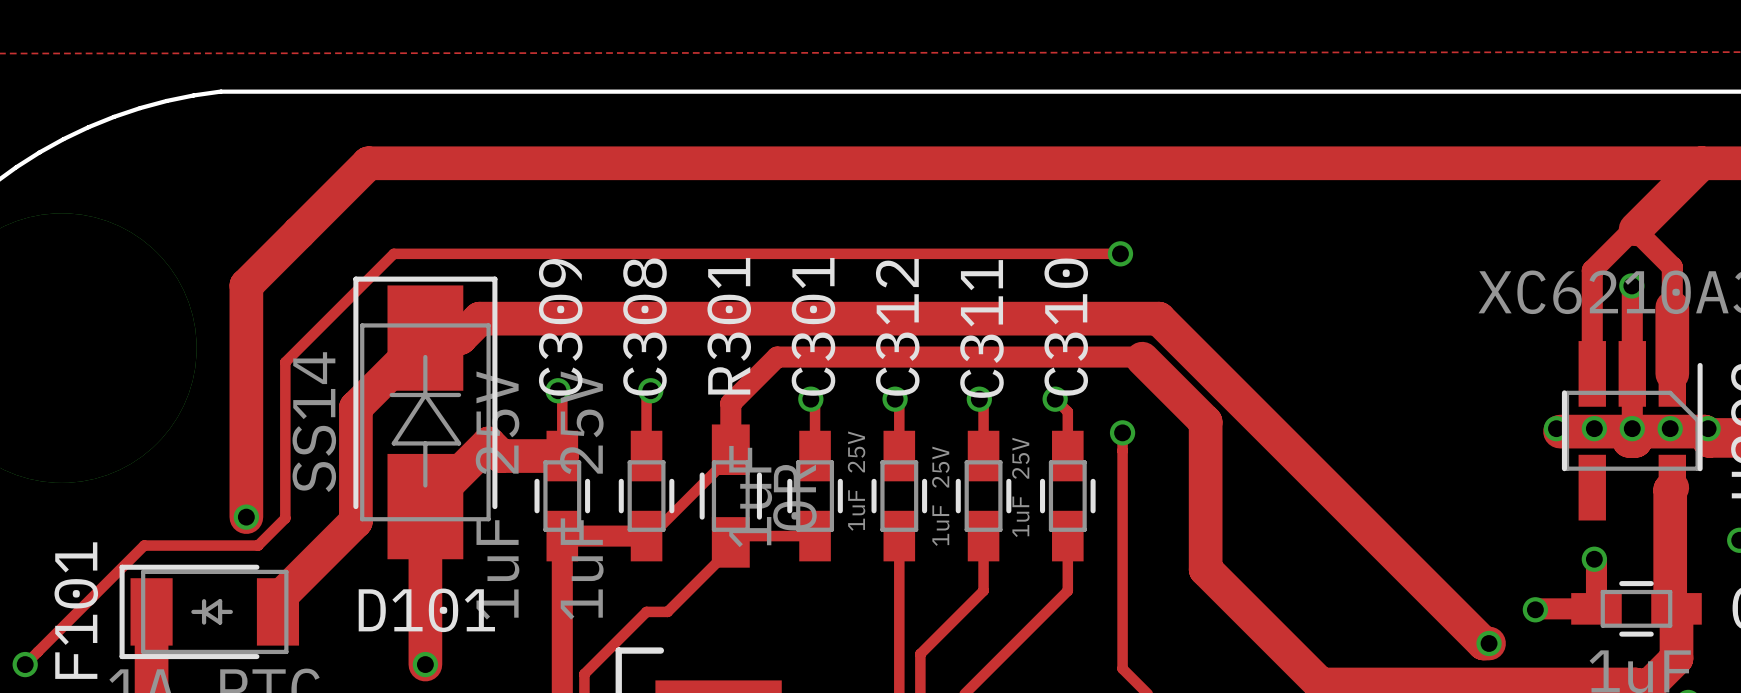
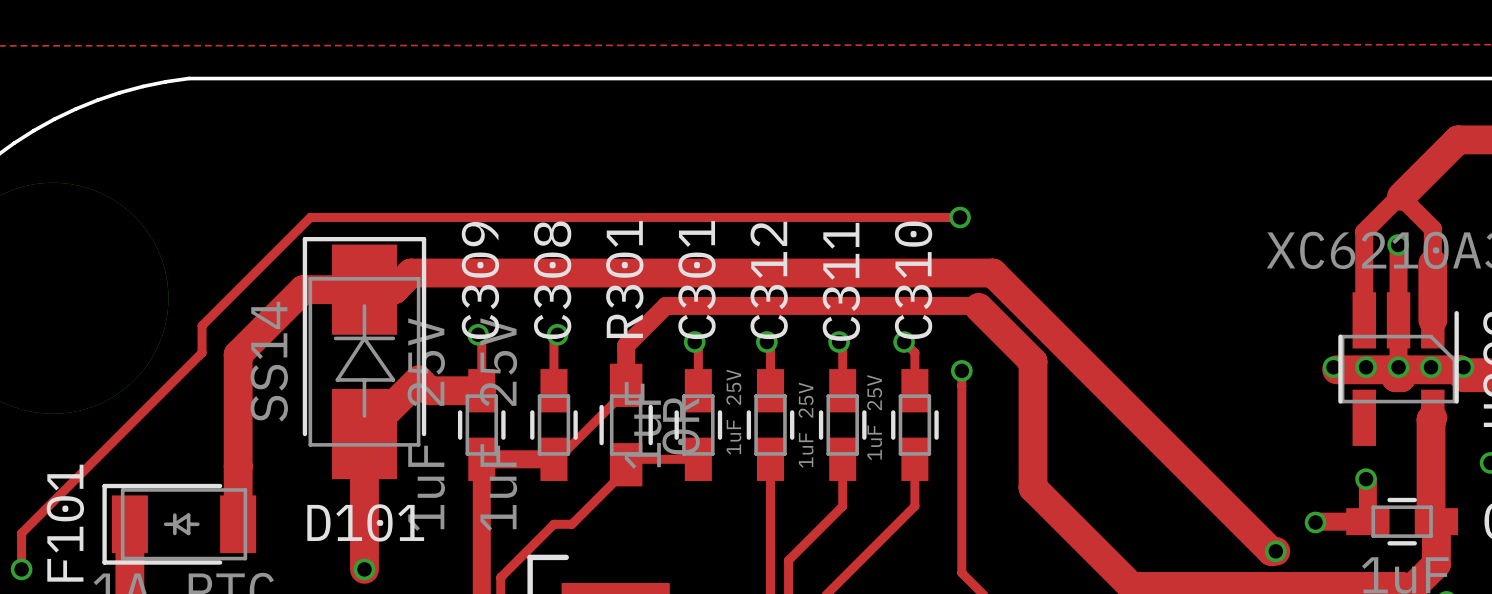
track: (1701, 163) (368, 163) (246, 285) (246, 517) -> none
track: (393, 253) (285, 362) (285, 518) (258, 545) (144, 545) (25, 664) -> (337, 217) (310, 217) (202, 325) (202, 352) (21, 533) (21, 569)
track: (425, 338) (355, 407) (355, 521) (277, 599) -> (364, 289) (303, 289) (238, 354) (238, 513)
via: (246, 517) -> none

